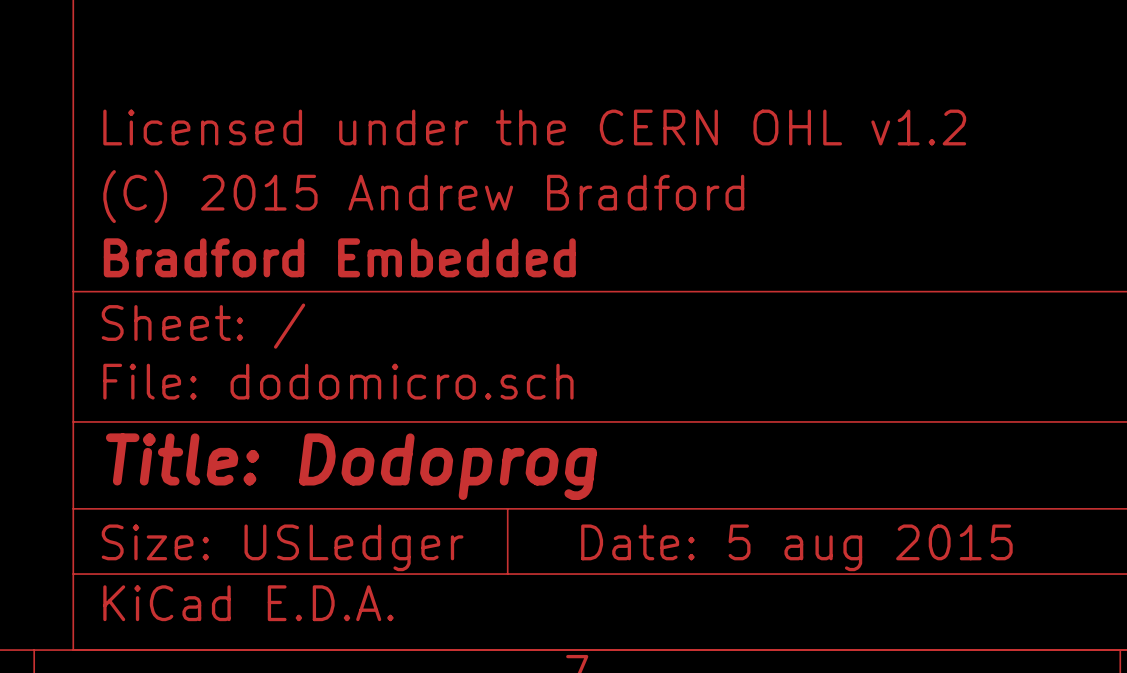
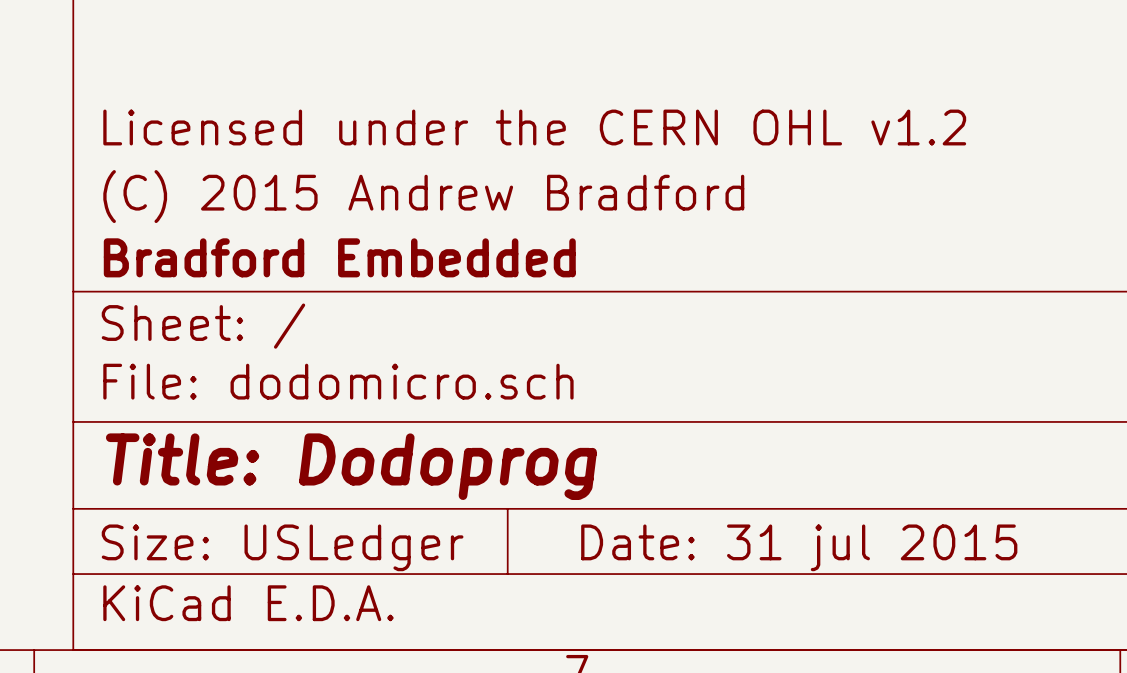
title block: Date: 5 aug 2015 (796, 547) -> Date: 31 jul 2015 (799, 547)

